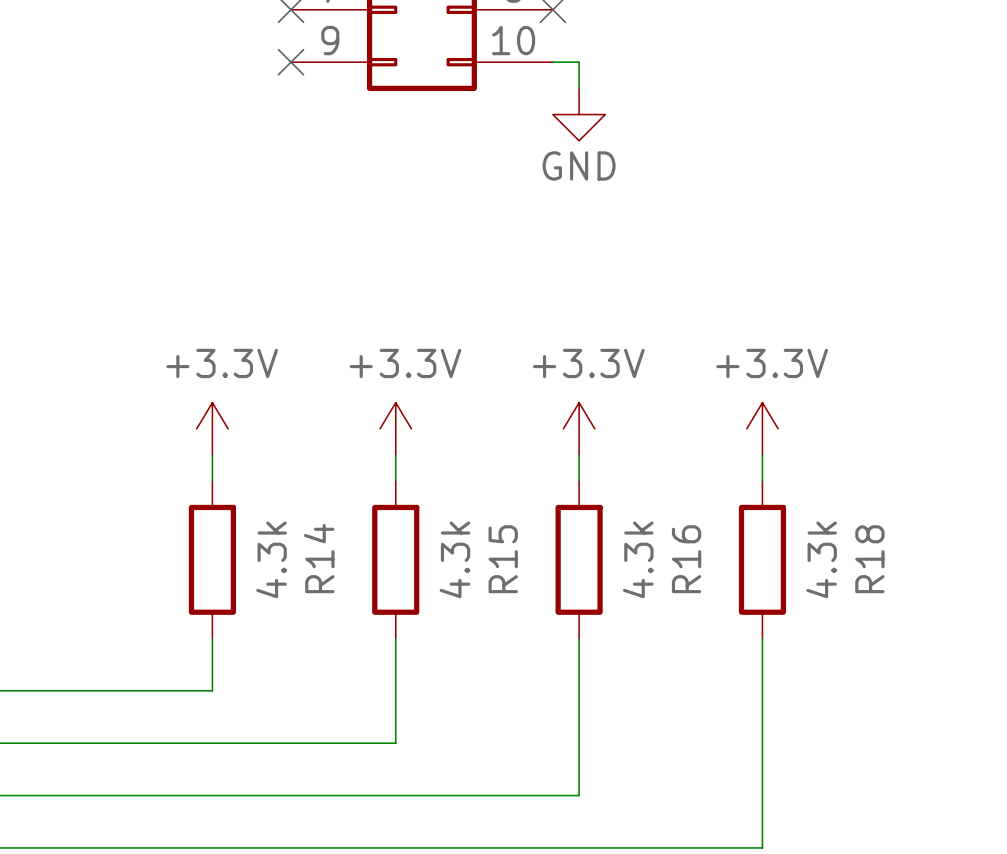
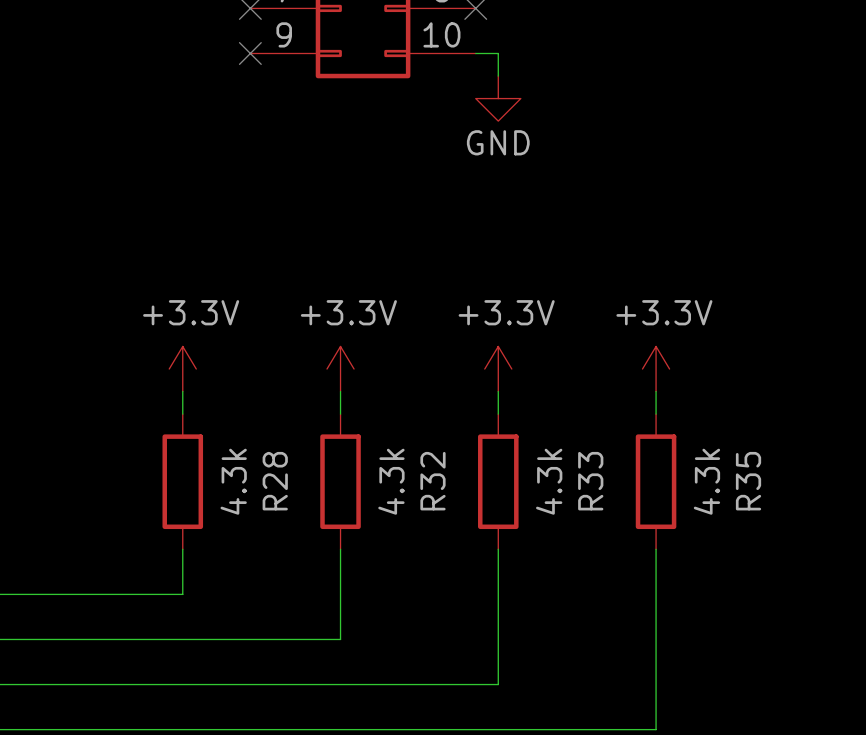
R14 name: R14 (319, 558) -> R28 (275, 481)
R15 name: R15 (503, 559) -> R32 (432, 481)
R16 name: R16 (686, 559) -> R33 (590, 481)
R18 name: R18 (869, 559) -> R35 (748, 481)

